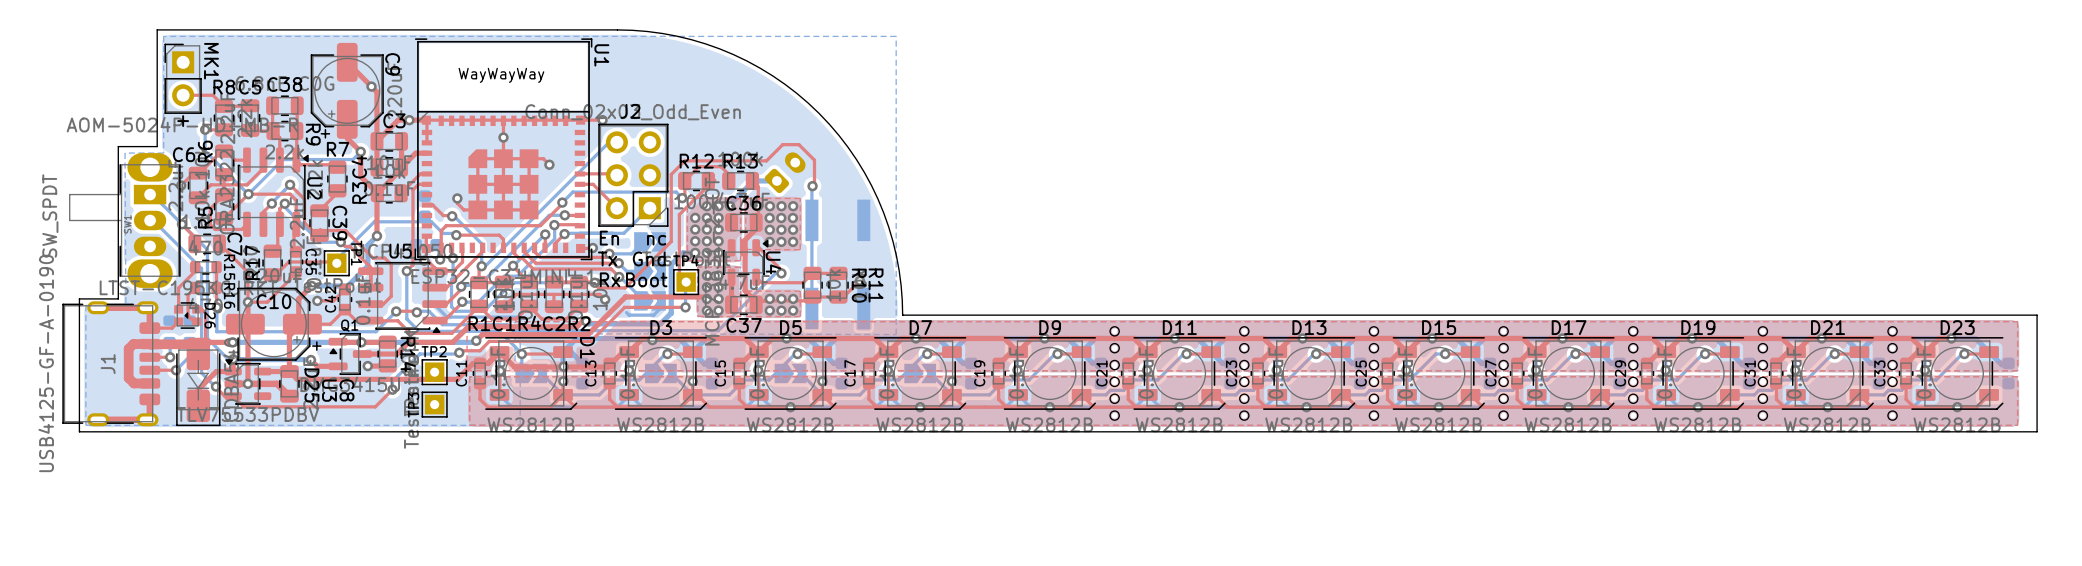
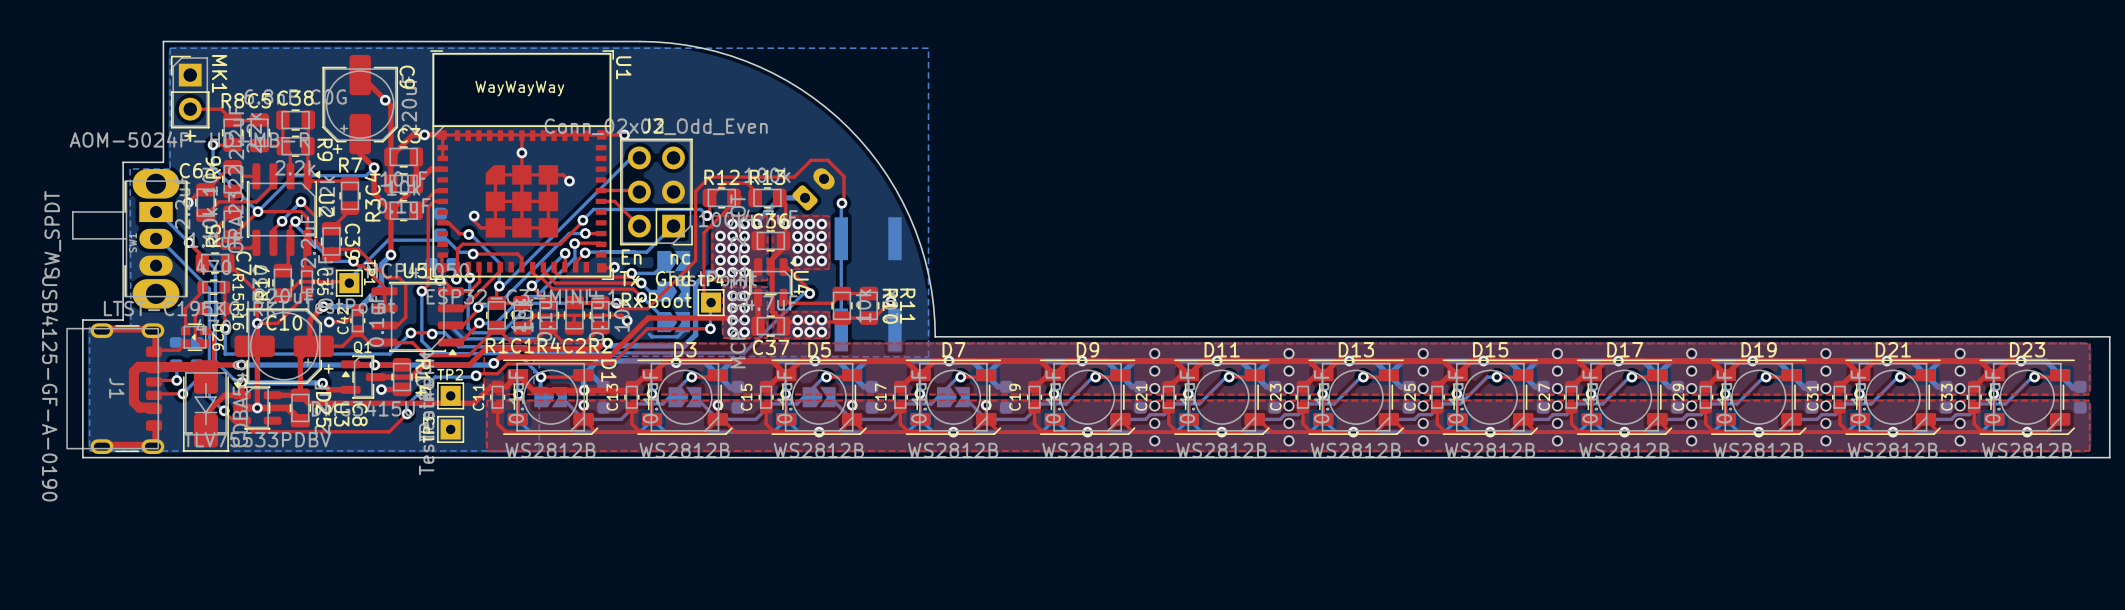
J1 footprint: [62, 301, 161, 427] -> [66, 323, 165, 455]

